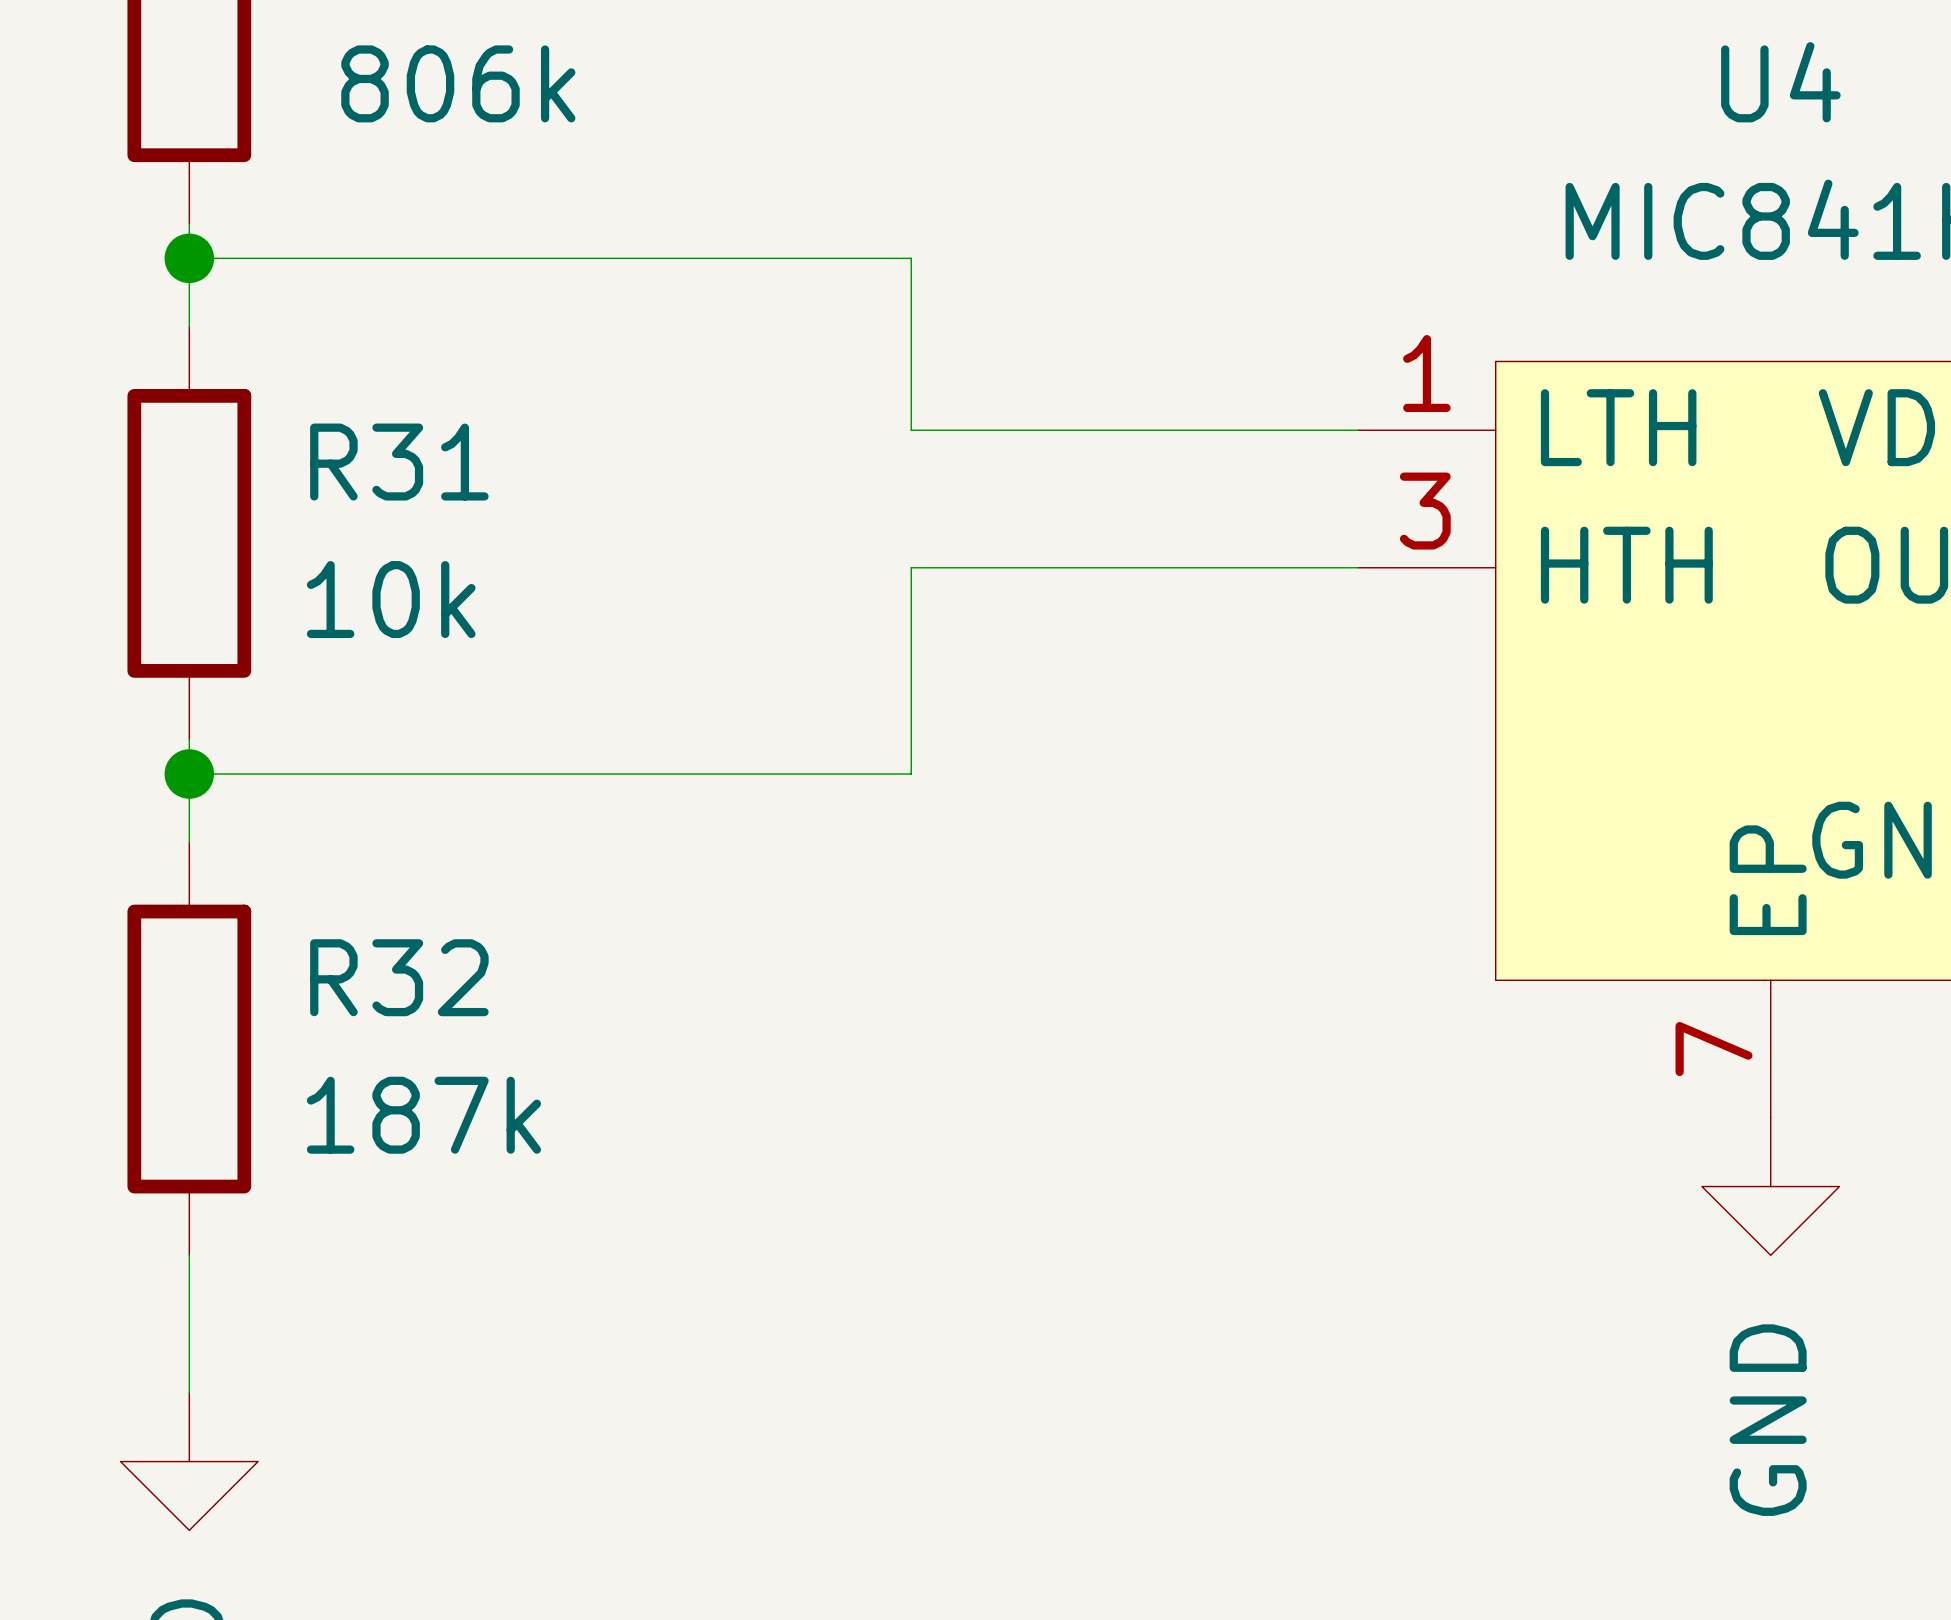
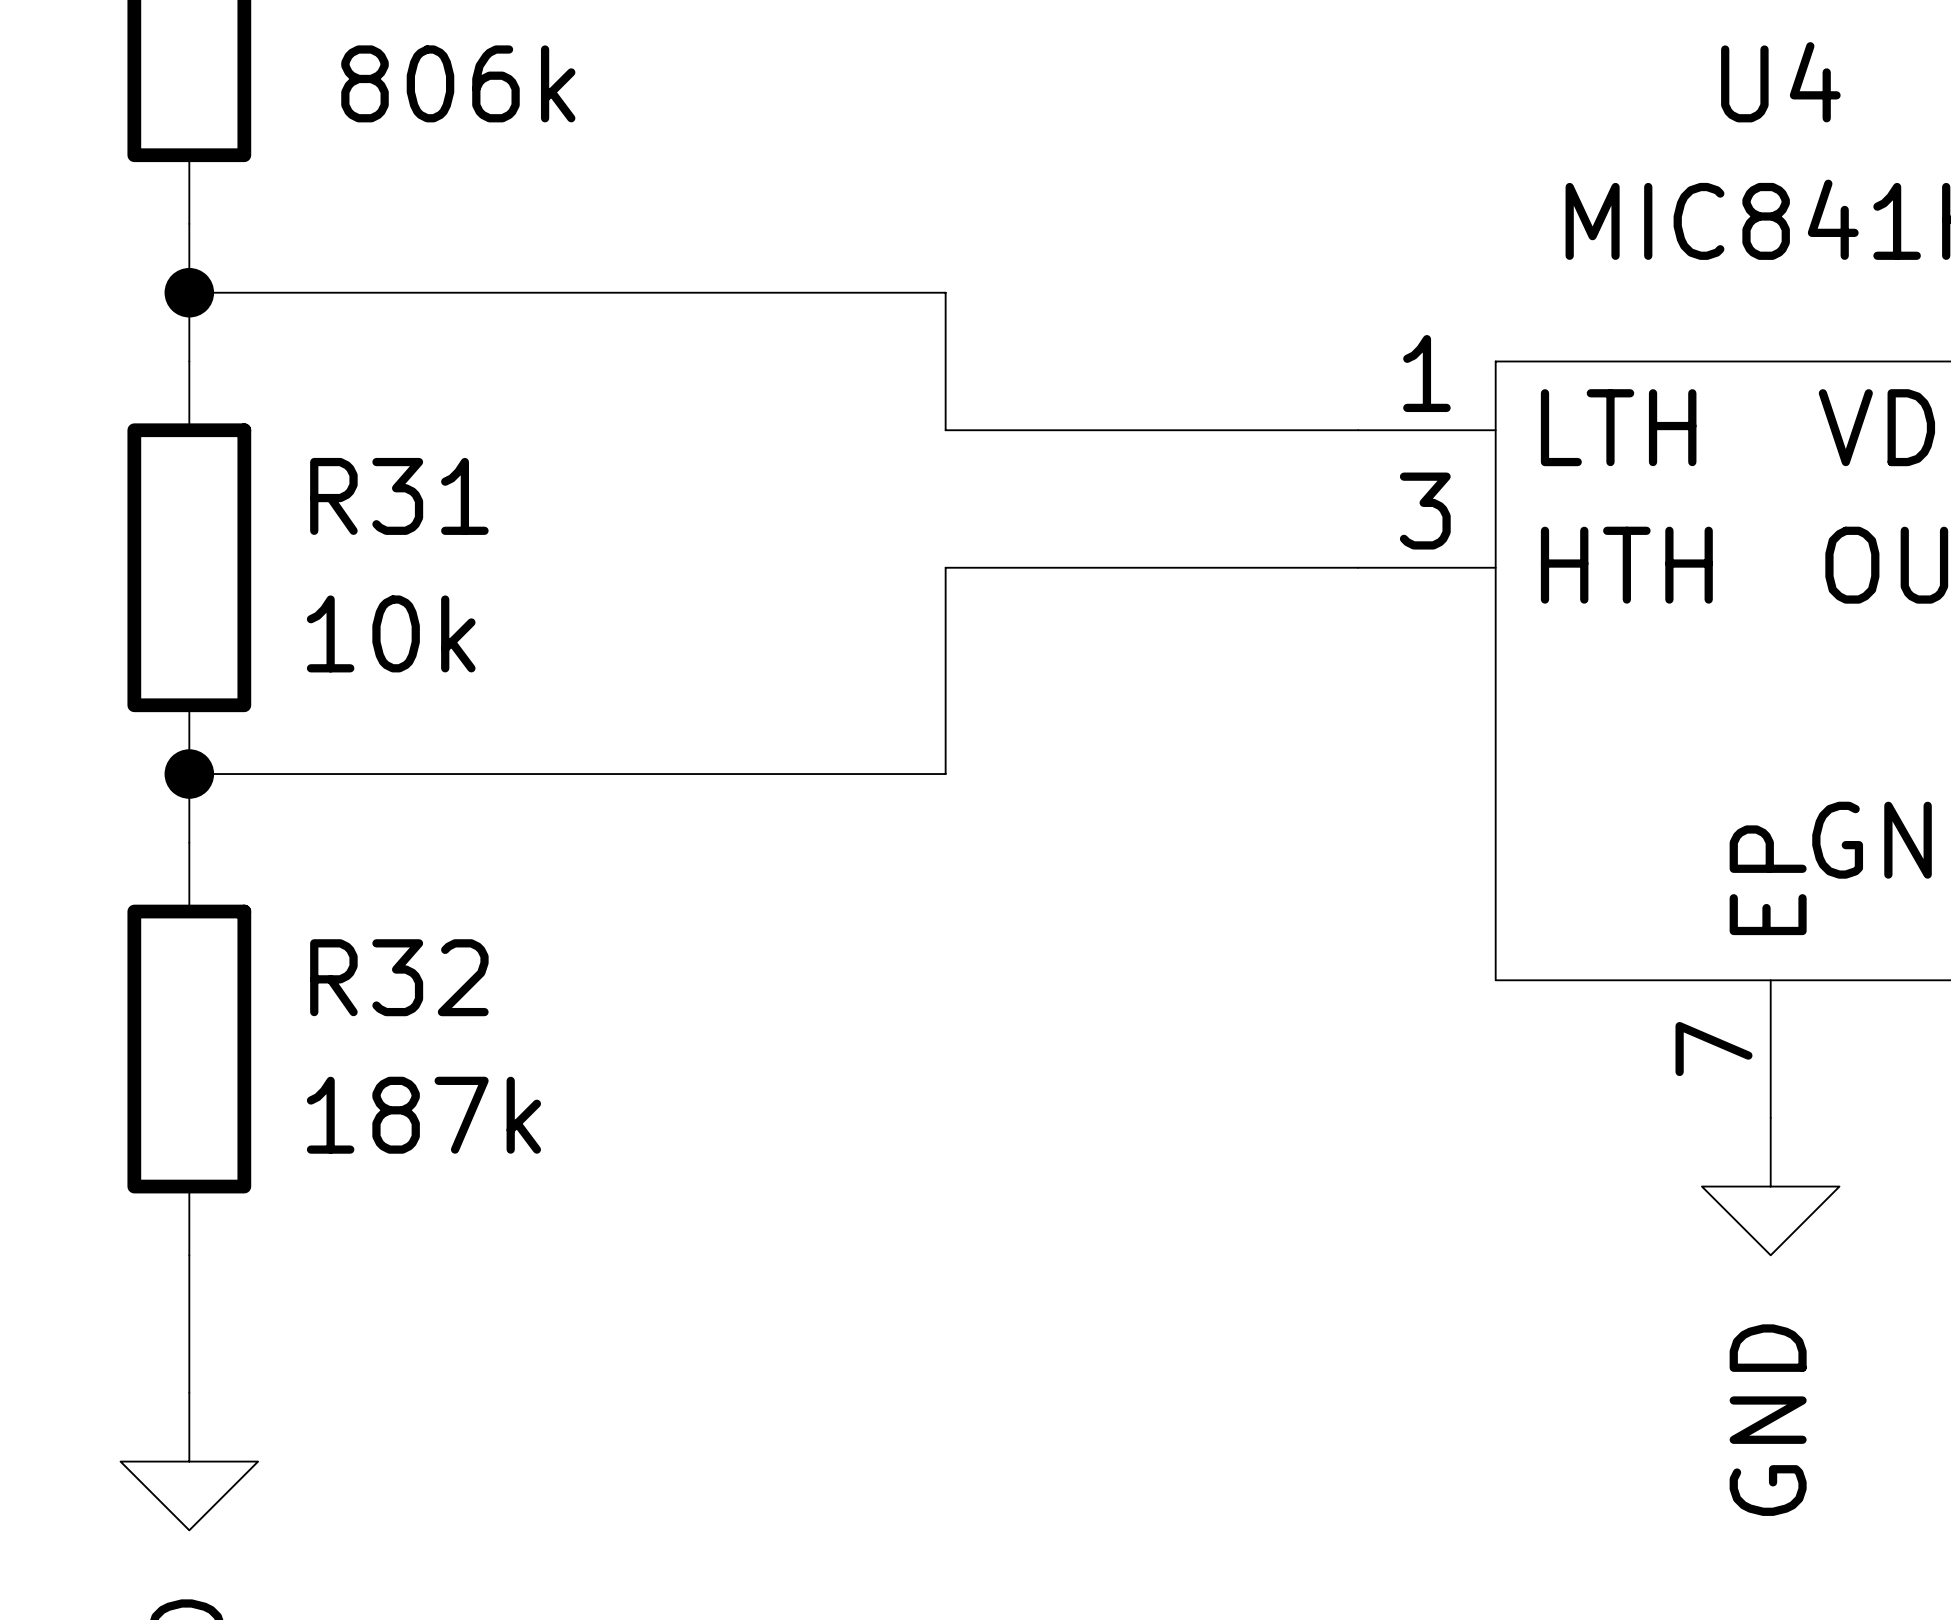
wire: (189, 258) (911, 258) (911, 430) (945, 430) -> (189, 292) (945, 292) (945, 430)
junction position: (189, 258) -> (189, 292)
R31 position: (189, 533) -> (189, 567)
wire: (945, 567) (911, 567) (911, 774) -> (945, 567) (945, 774) (911, 774)

